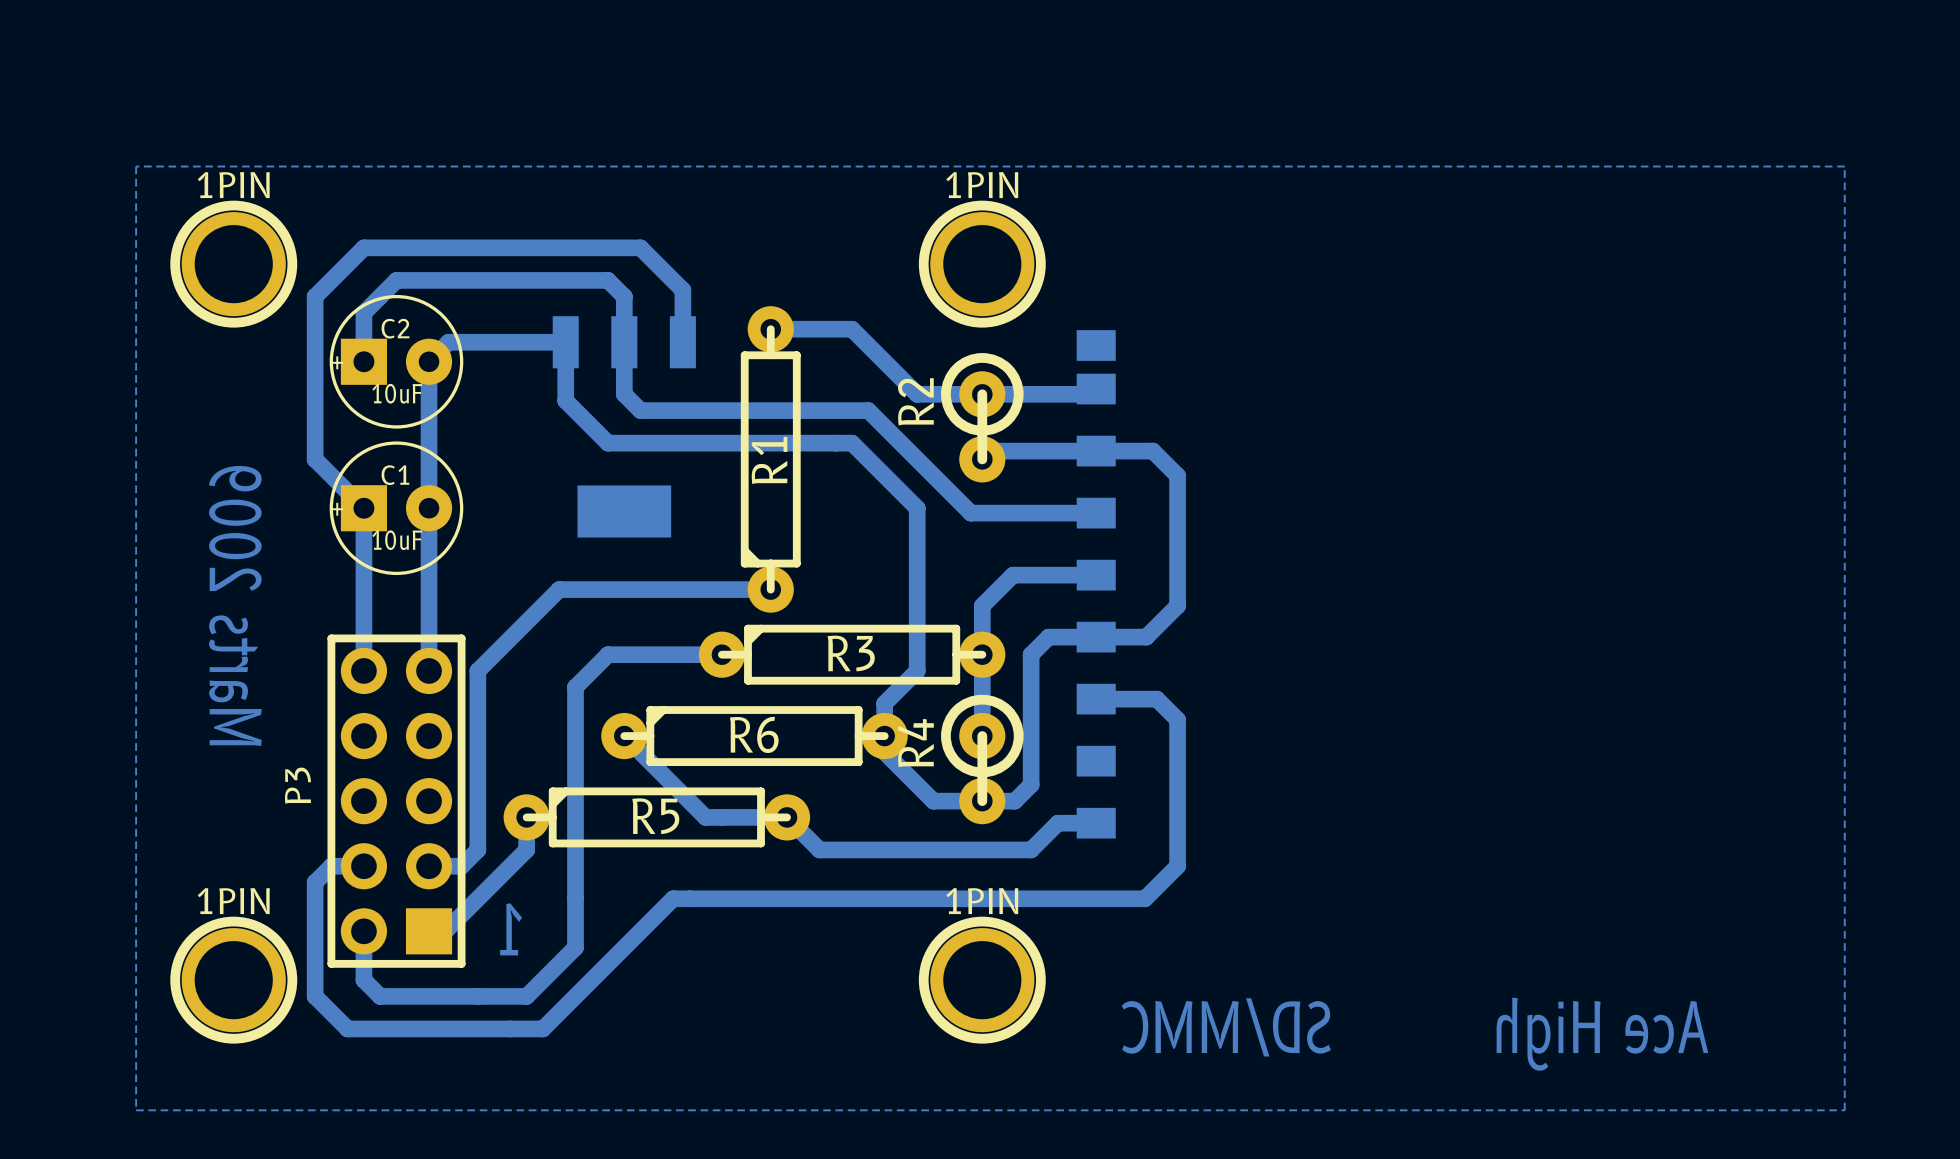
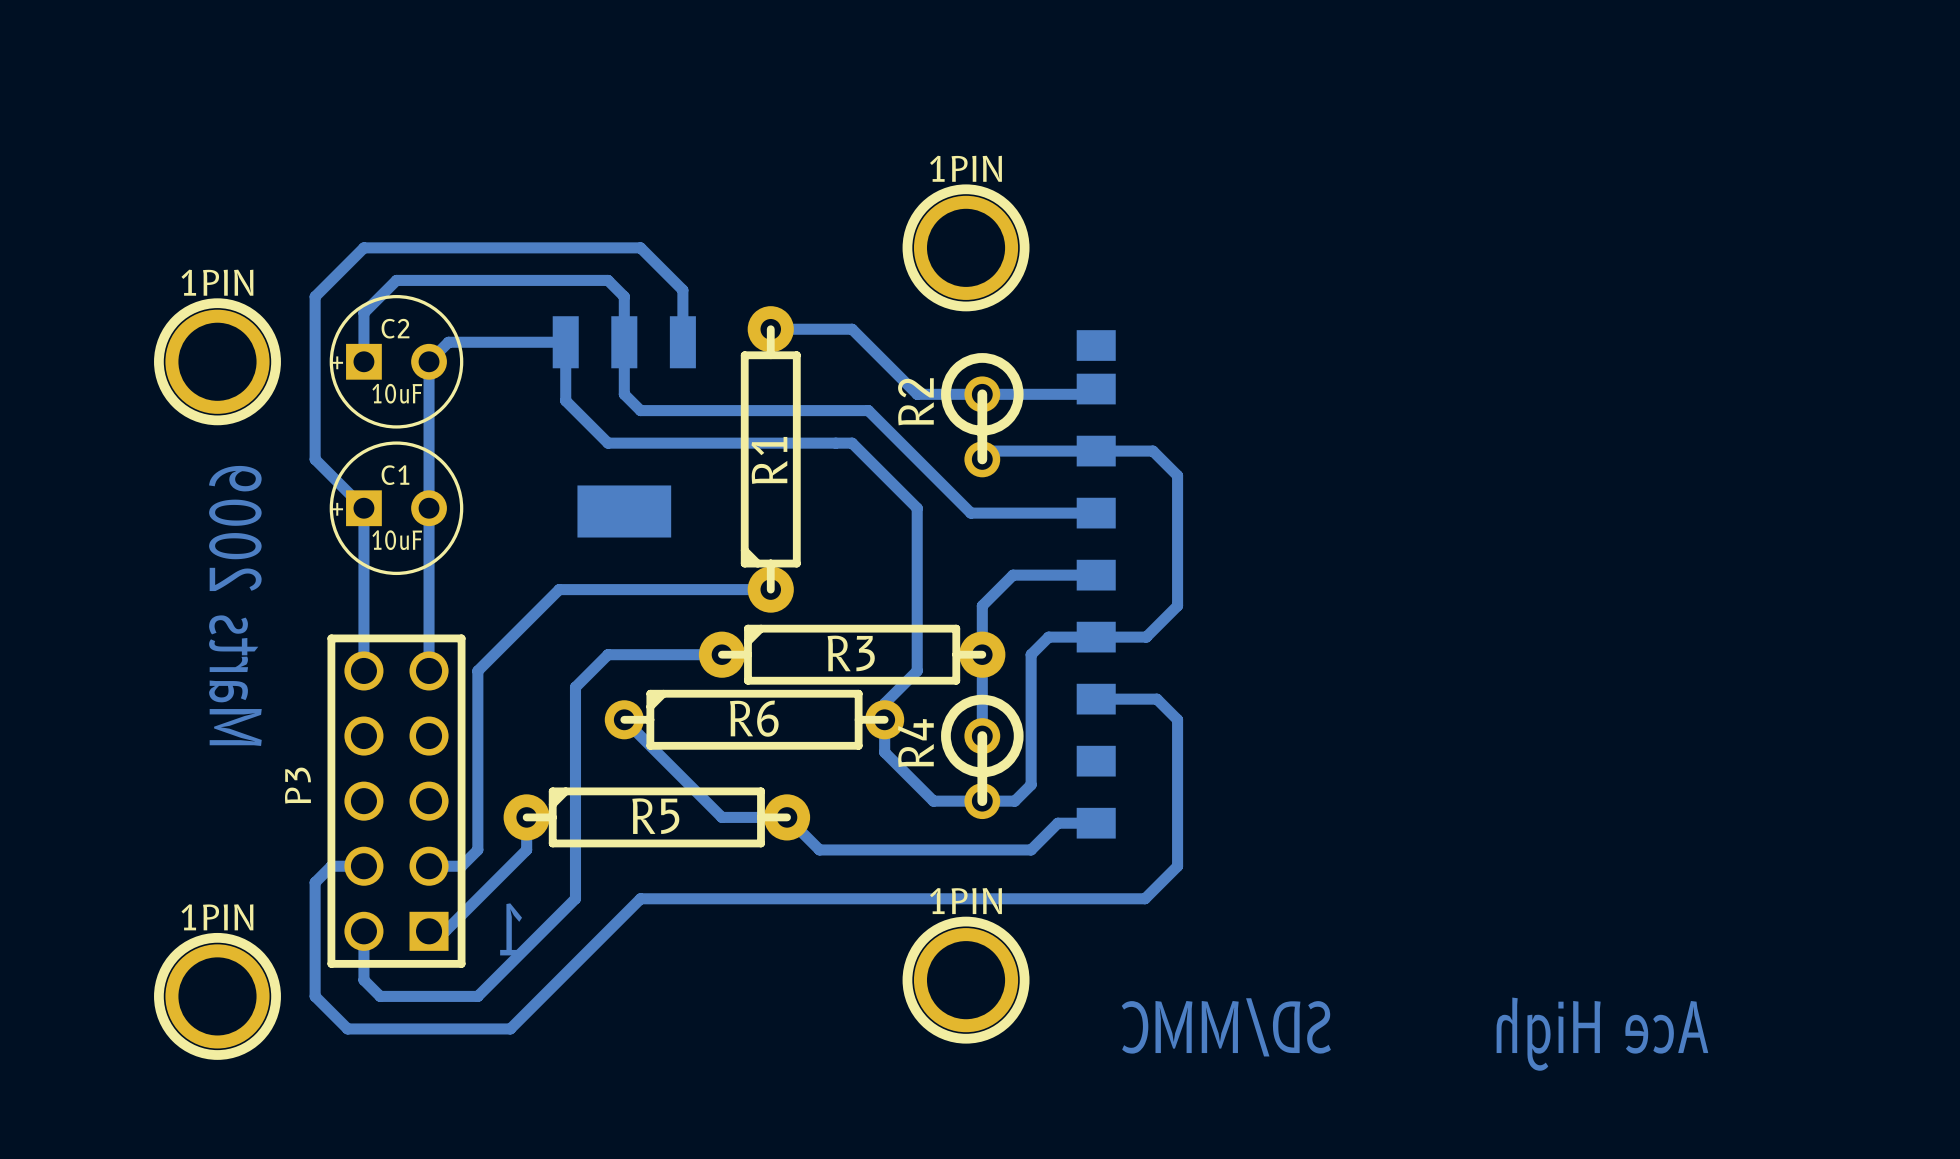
bottom zone outline: (136, 166) (1844, 166) (1844, 1110) (136, 1110) (136, 166) -> none
1PIN position: (233, 264) -> (217, 361)
1PIN position: (982, 264) -> (966, 247)
C2 footprint: [329, 294, 464, 429] -> [329, 294, 464, 429]
bottom track width: thick (770, 329) (852, 329) (917, 394) (1090, 394) (1096, 389) -> thin (770, 329) (852, 329) (917, 394) (1090, 394) (1096, 389)
bottom track width: thick (682, 342) (682, 290) (640, 247) (363, 247) (315, 296) (315, 459) (363, 508) (363, 670) -> thin (682, 342) (682, 290) (640, 247) (363, 247) (315, 296) (315, 459) (363, 508) (363, 670)
R2 footprint: [941, 353, 1024, 483] -> [941, 353, 1024, 478]
bottom track width: thick (363, 361) (363, 312) (396, 280) (608, 280) (624, 296) (624, 394) (640, 410) (868, 410) (970, 513) (1096, 513) -> thin (363, 361) (363, 312) (396, 280) (608, 280) (624, 296) (624, 394) (640, 410) (868, 410) (970, 513) (1096, 513)
C1 footprint: [329, 441, 464, 576] -> [329, 441, 464, 576]
bottom track width: thick (982, 459) (990, 451) (1152, 451) (1177, 475) (1177, 605) (1146, 637) (1048, 637) (1031, 654) (1031, 784) (1014, 801) (933, 801) (884, 752) (884, 703) (917, 670) (917, 508) (852, 443) (608, 443) (565, 400) (565, 342) (448, 342) (429, 361) (429, 670) -> thin (982, 459) (990, 451) (1152, 451) (1177, 475) (1177, 605) (1146, 637) (1048, 637) (1031, 654) (1031, 784) (1014, 801) (933, 801) (884, 752) (884, 703) (917, 670) (917, 508) (852, 443) (608, 443) (565, 400) (565, 342) (448, 342) (429, 361) (429, 670)
bottom track width: thick (1096, 575) (1013, 575) (982, 605) (982, 736) -> thin (1096, 575) (1013, 575) (982, 605) (982, 736)
bottom track width: thick (770, 589) (559, 589) (477, 670) (477, 849) (461, 866) (429, 866) -> thin (770, 589) (559, 589) (477, 670) (477, 849) (461, 866) (429, 866)
P3 footprint: [327, 634, 466, 968] -> [327, 634, 466, 968]
bottom track width: thick (721, 654) (608, 654) (575, 687) (575, 898) -> thin (721, 654) (608, 654) (575, 687) (575, 898)
R4 footprint: [941, 694, 1024, 825] -> [941, 694, 1024, 820]
bottom track width: thick (1096, 699) (1156, 699) (1177, 719) (1177, 866) (1145, 898) (673, 898) -> thin (1096, 699) (1156, 699) (1177, 719) (1177, 866) (1145, 898) (673, 898)
R6 footprint: [601, 706, 908, 766] -> [604, 689, 905, 750]
R6 name position: R6 (754, 734) -> R6 (754, 718)
bottom track: (624, 736) (705, 817) (721, 817) -> (624, 719) (721, 817)
bottom track width: thick (526, 817) (526, 849) (445, 931) (429, 931) -> thin (526, 817) (526, 849) (445, 931) (429, 931)
bottom track width: thick (721, 817) (787, 817) (819, 849) (1031, 849) (1057, 823) (1096, 823) -> thin (721, 817) (787, 817) (819, 849) (1031, 849) (1057, 823) (1096, 823)
bottom track width: thick (363, 866) (331, 866) (315, 882) (315, 996) (347, 1028) (510, 1028) -> thin (363, 866) (331, 866) (315, 882) (315, 996) (347, 1028) (510, 1028)
bottom track: (575, 898) (575, 947) (526, 996) (477, 996) -> (575, 898) (477, 996)
bottom track: (673, 898) (542, 1028) (510, 1028) -> (673, 898) (640, 898) (510, 1028)
bottom track width: thick (363, 931) (363, 980) (380, 996) (477, 996) -> thin (363, 931) (363, 980) (380, 996) (477, 996)
1PIN position: (233, 980) -> (217, 996)
1PIN position: (982, 980) -> (966, 980)

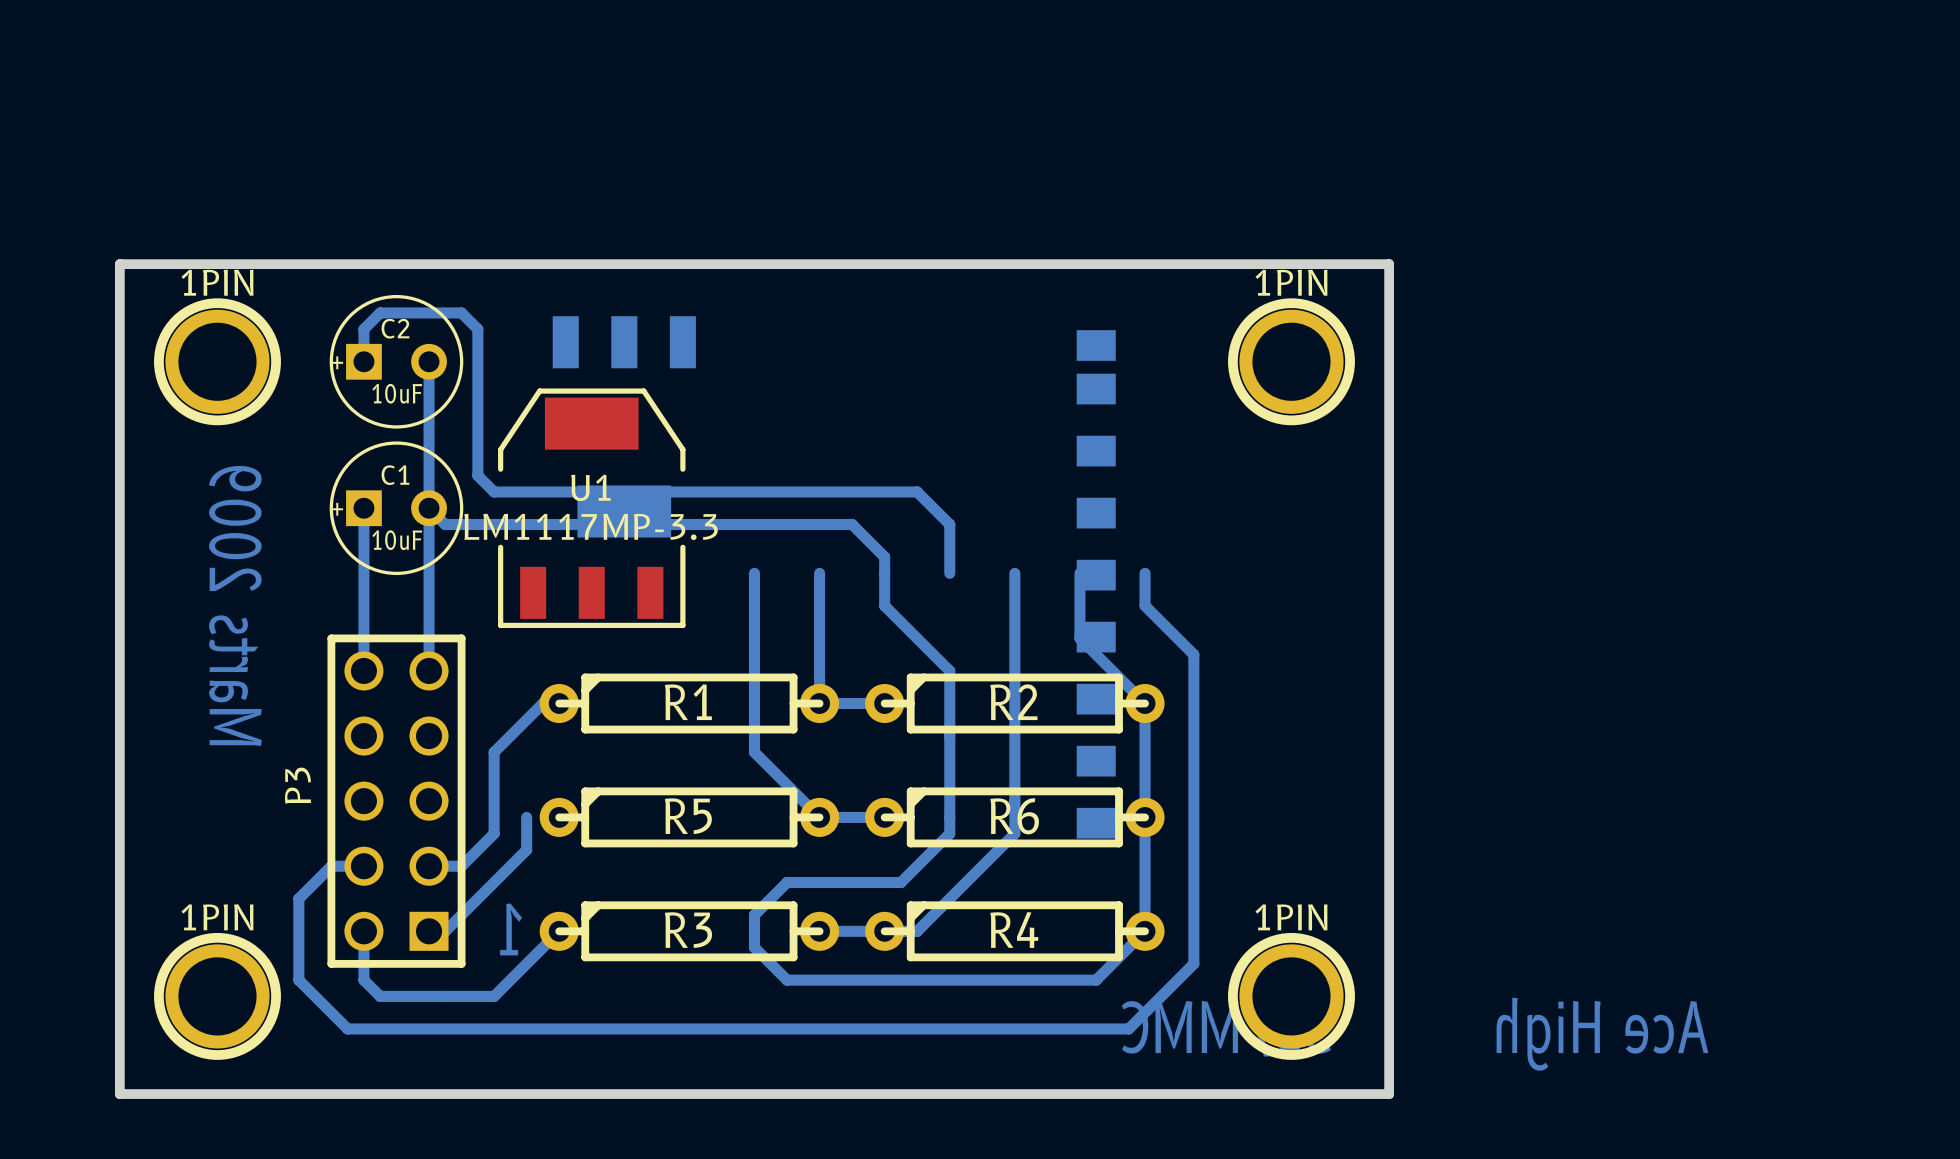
1PIN position: (966, 247) -> (1291, 361)
board edge: none -> (119, 264) (1389, 264) (1389, 1094) (119, 1094) (119, 264)
R1 footprint: [740, 306, 801, 613] -> [539, 673, 840, 734]
bottom track: (363, 329) (363, 312) (396, 280) (608, 280) (624, 296) (624, 394) (640, 410) (868, 410) (970, 513) (1096, 513) -> (363, 329) (380, 312) (461, 312) (477, 329) (477, 475) (494, 491) (917, 491) (949, 524) (949, 573)
bottom track: (770, 329) (852, 329) (917, 394) (1090, 394) (1096, 389) -> none
bottom track: (682, 342) (682, 290) (640, 247) (363, 247) (315, 296) (315, 459) (363, 508) -> none
R2 footprint: [941, 353, 1024, 478] -> [865, 673, 1165, 734]
bottom track: (429, 361) (448, 342) (565, 342) (565, 400) (608, 443) (852, 443) (917, 508) (917, 670) (884, 703) (884, 752) (933, 801) (1014, 801) (1031, 784) (1031, 654) (1048, 637) (1146, 637) (1177, 605) (1177, 475) (1152, 451) (990, 451) (982, 459) -> none
R2 name position: R2 (915, 401) -> R2 (1013, 702)
bottom track: none -> (429, 508) (445, 524) (852, 524) (884, 557) (884, 605) (949, 670) (949, 833) (900, 882) (787, 882) (754, 915) (754, 947) (787, 980) (1096, 980) (1145, 931) (1145, 703) (1079, 638) (1079, 573)
U1: none -> LM1117MP-3.3 (591, 508)
bottom track: none -> (754, 573) (754, 752) (819, 817) (884, 817)
bottom track: none -> (819, 573) (819, 703) (884, 703)
bottom track: none -> (1014, 573) (1014, 833) (917, 931) (819, 931)
bottom track: (1096, 575) (1013, 575) (982, 605) (982, 736) -> none
bottom track: (770, 589) (559, 589) (477, 670) (477, 849) -> (559, 703) (542, 703) (494, 752) (494, 833) (477, 849)
R3 footprint: [698, 624, 1006, 685] -> [539, 901, 840, 962]
bottom track: (721, 654) (608, 654) (575, 687) (575, 898) (477, 996) -> (559, 931) (494, 996) (477, 996)
R4 footprint: [941, 694, 1024, 820] -> [865, 901, 1165, 962]
bottom track: (1096, 699) (1156, 699) (1177, 719) (1177, 866) (1145, 898) (640, 898) (510, 1028) -> (1145, 573) (1145, 605) (1193, 654) (1193, 963) (1128, 1028) (510, 1028)
bottom track: (624, 719) (721, 817) (787, 817) (819, 849) (1031, 849) (1057, 823) (1096, 823) -> none
R6 position: (754, 719) -> (1014, 817)
R4 name position: R4 (915, 743) -> R4 (1014, 929)
R5 footprint: [503, 787, 811, 848] -> [539, 787, 840, 848]
bottom track: (315, 882) (315, 996) -> (315, 882) (298, 898) (298, 980) (315, 996)
1PIN position: (966, 980) -> (1291, 996)

